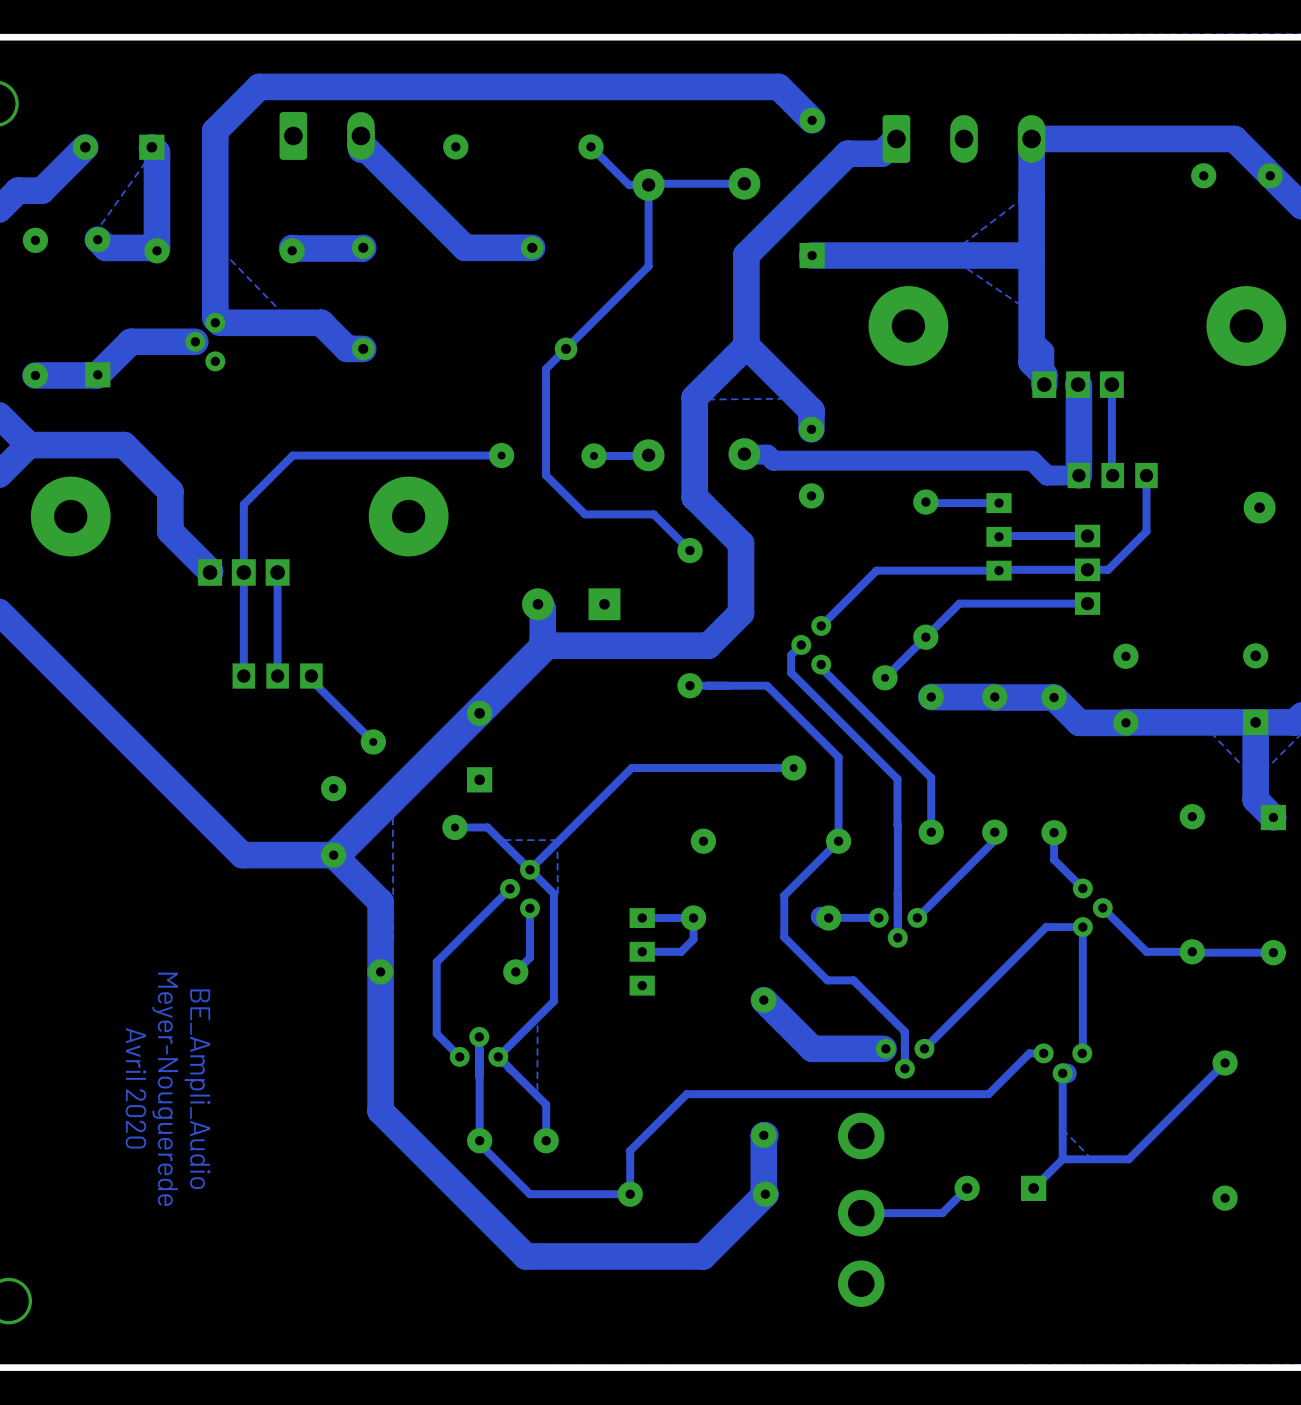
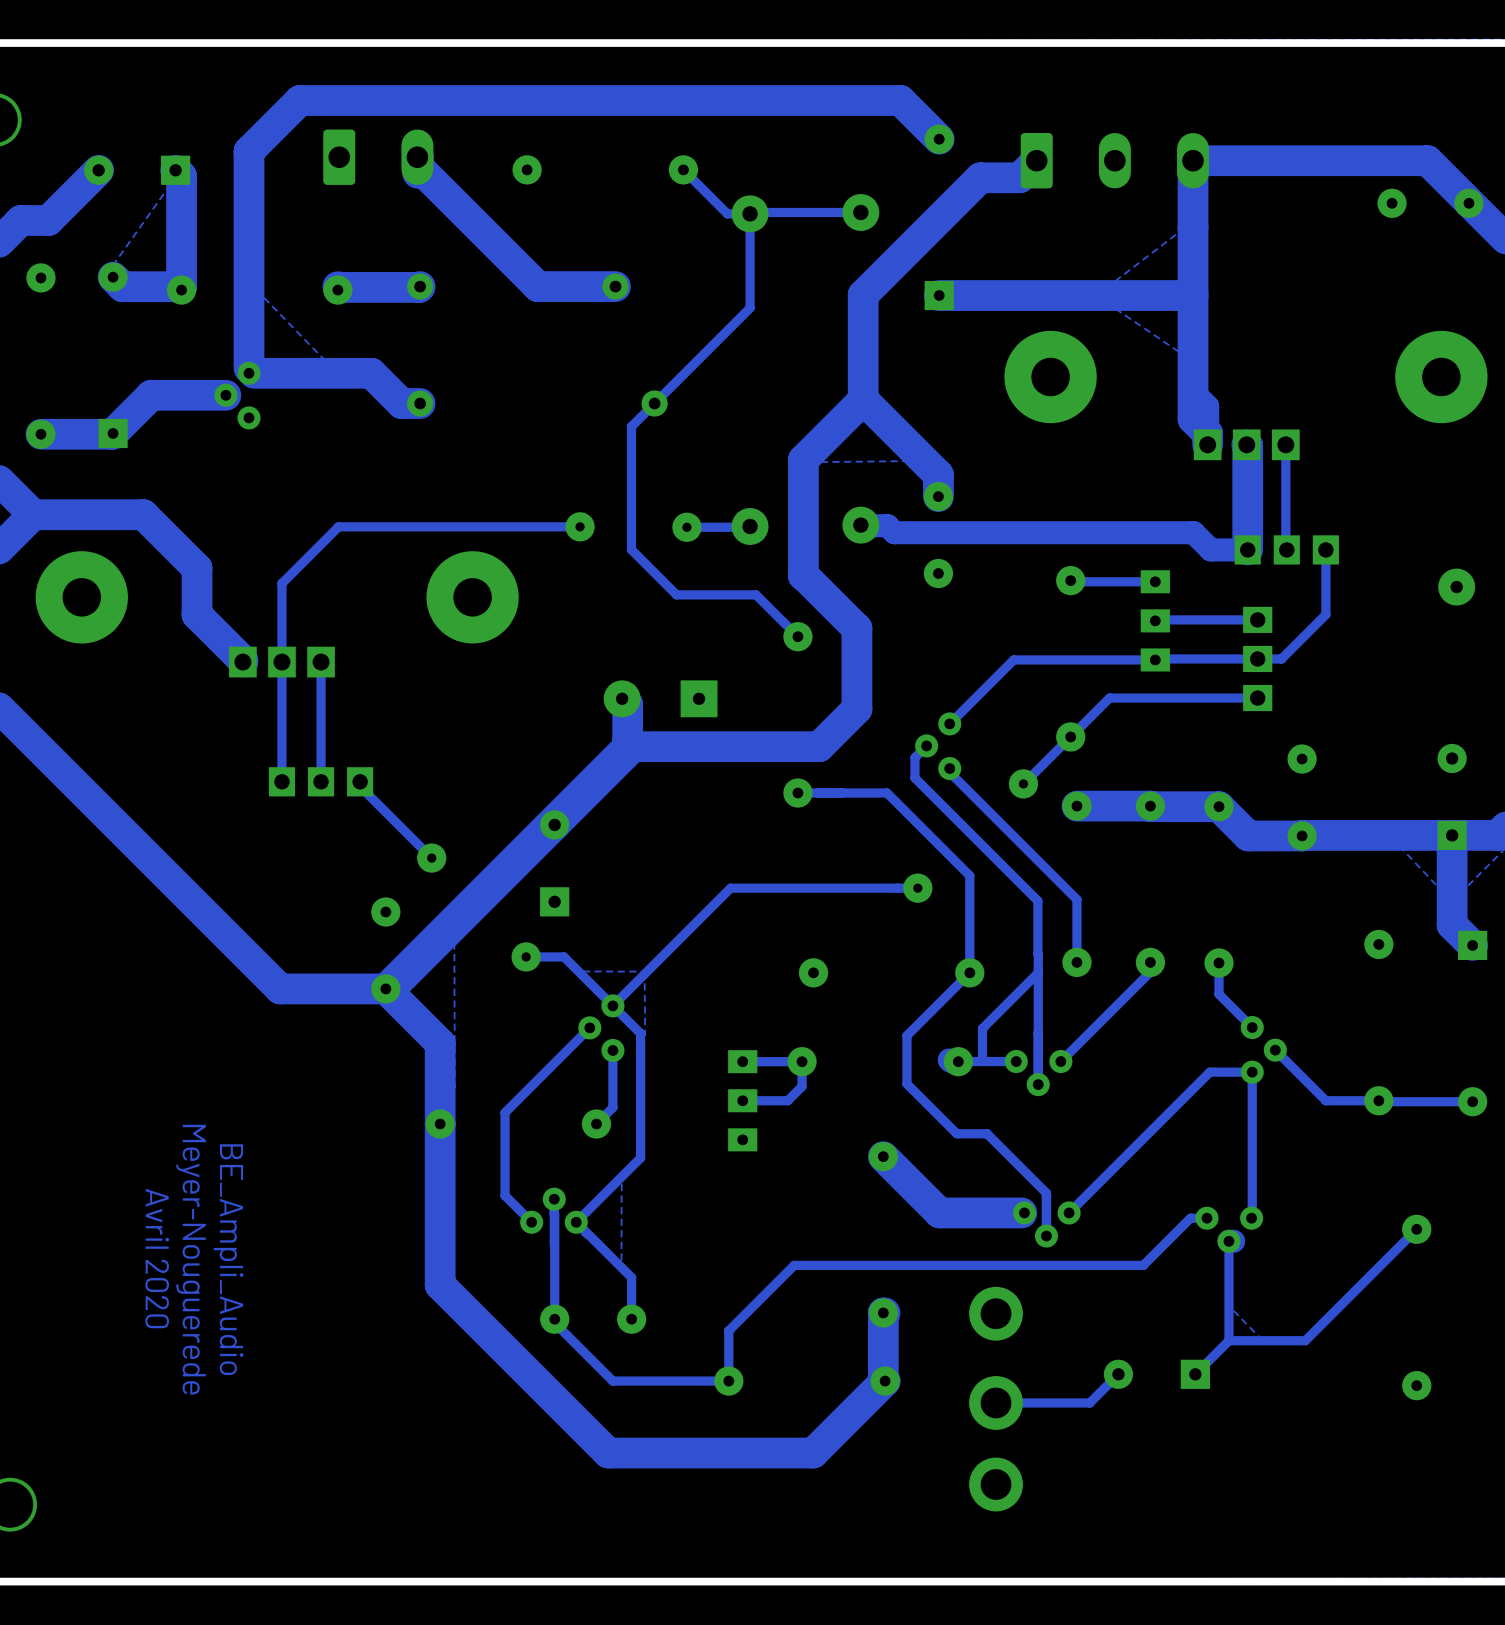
track: none -> (1038, 972) (982, 1028) (982, 1061)

